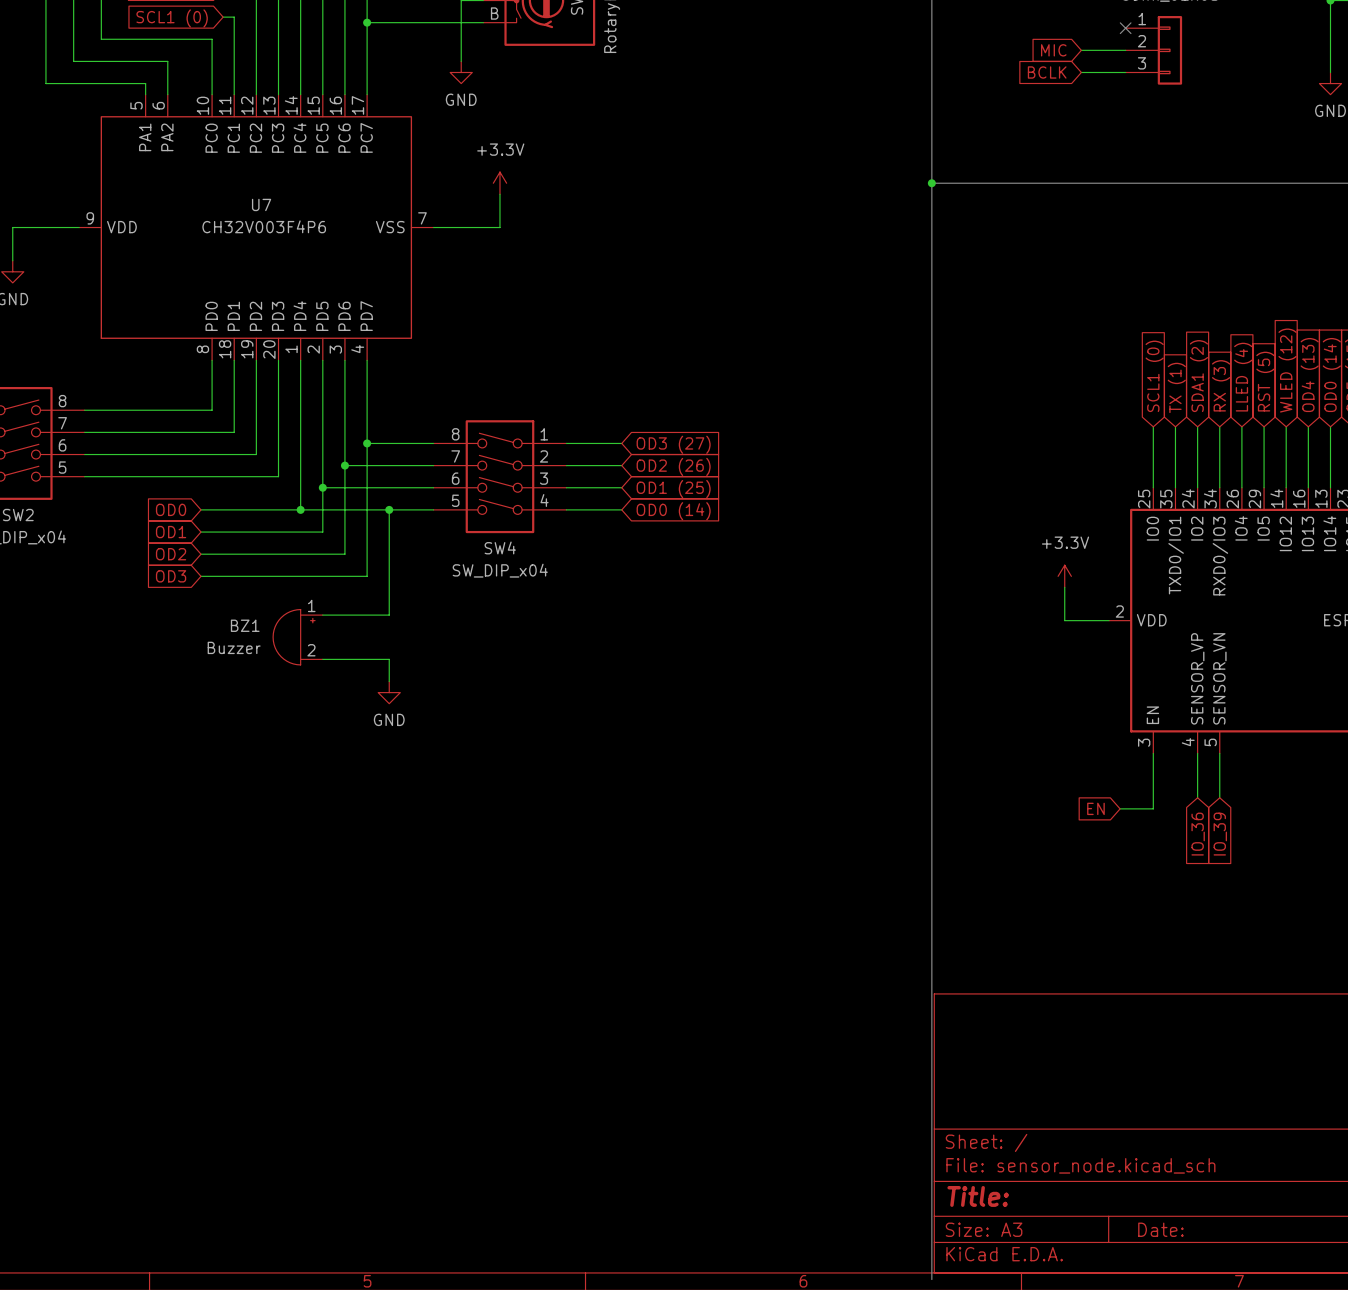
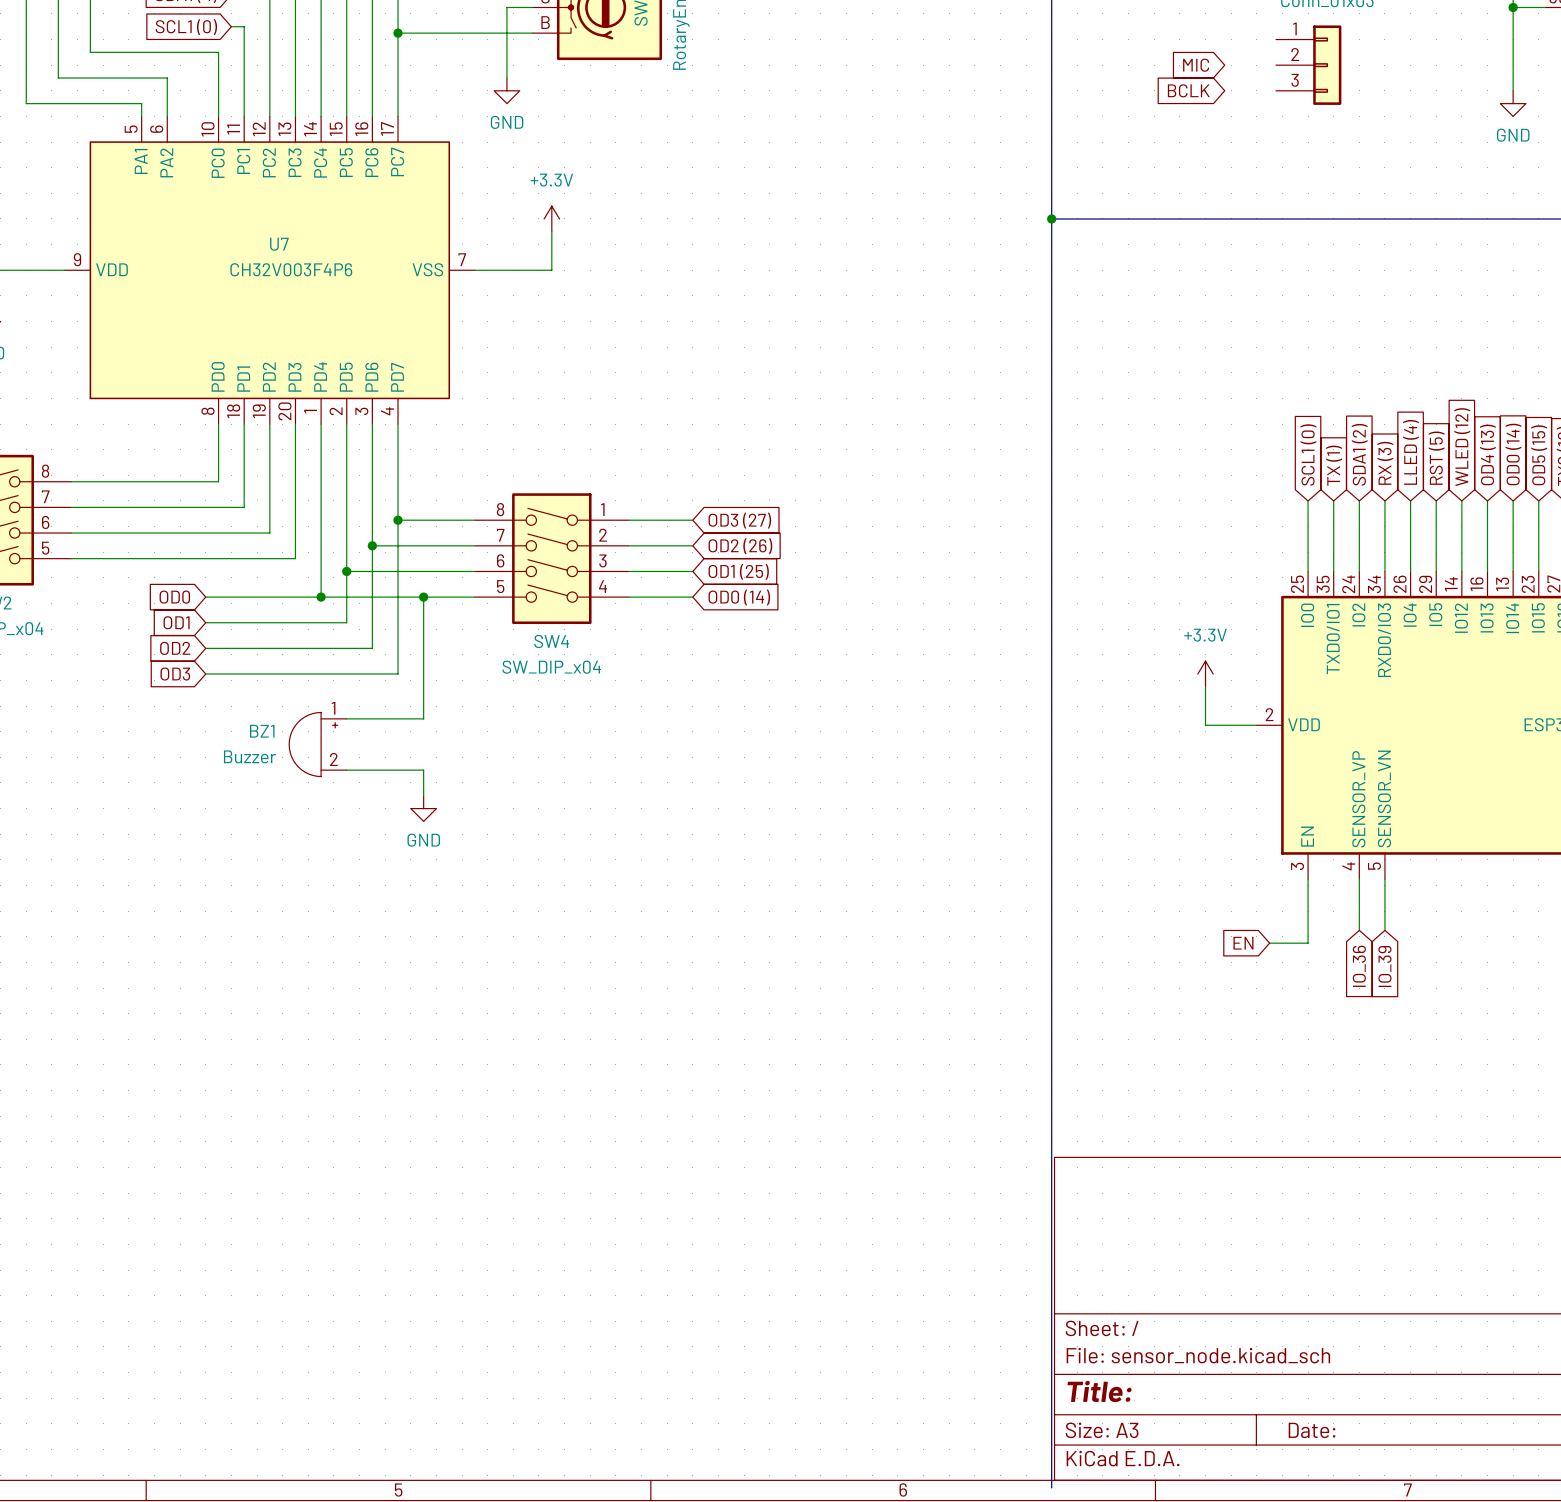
no-connect mark: (1125, 28) -> none
wire: (1081, 50) (1125, 50) -> none
wire: (1081, 72) (1125, 72) -> none

